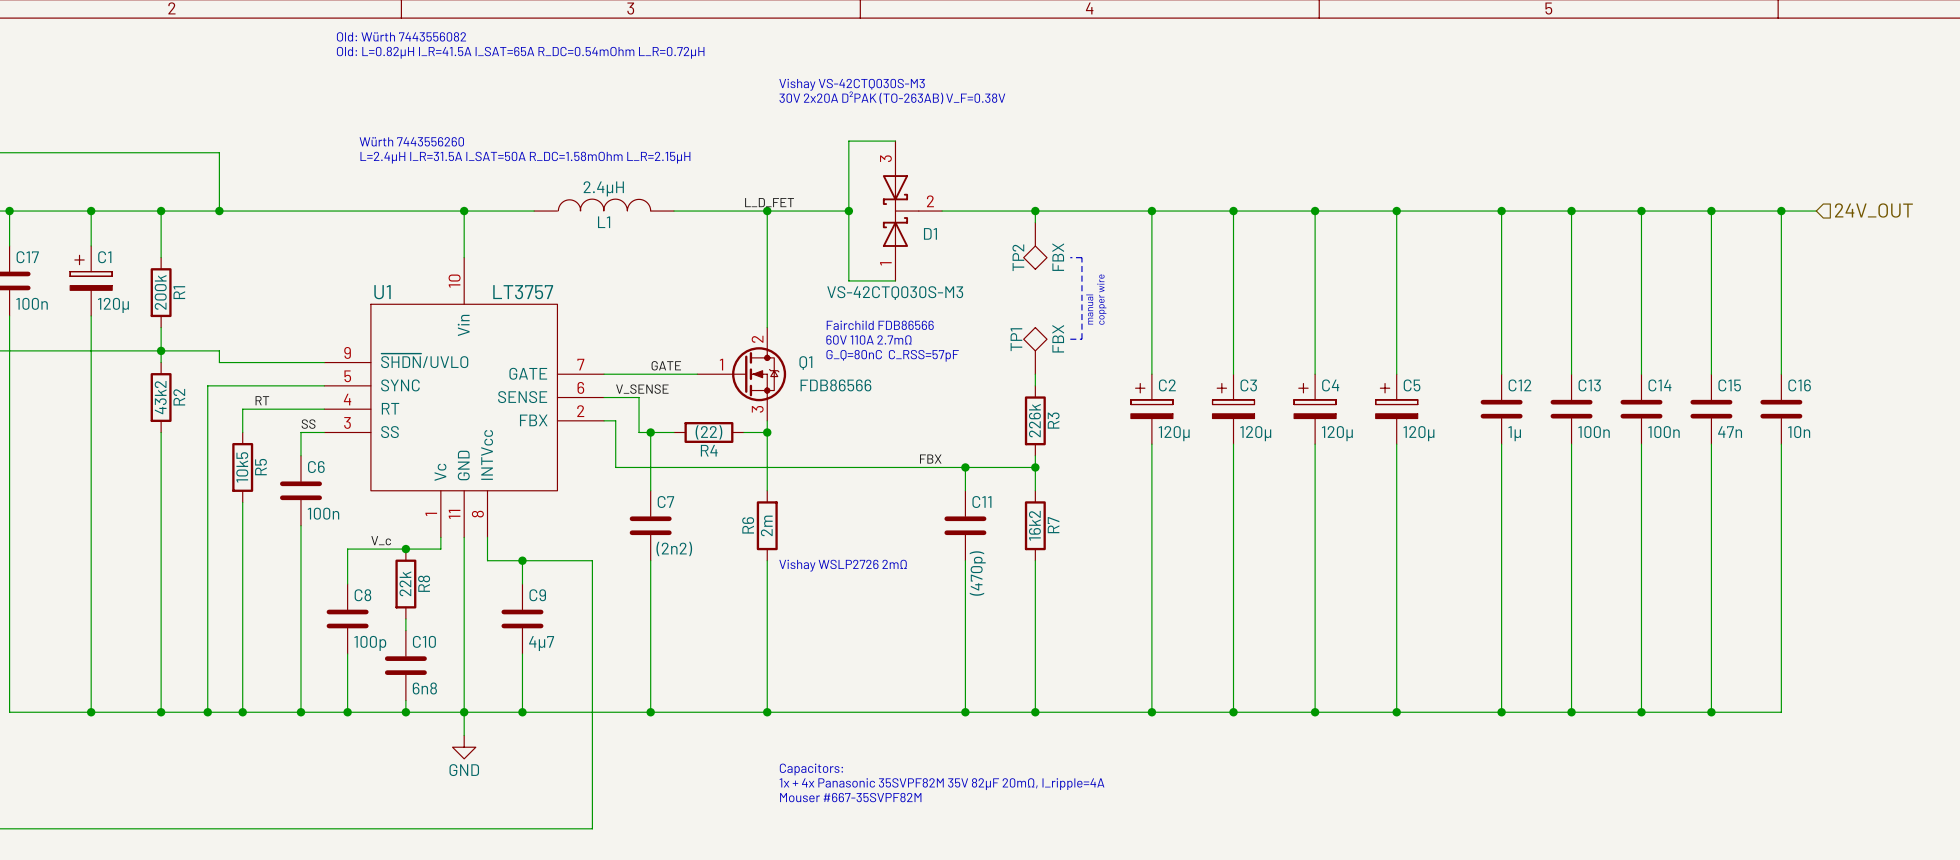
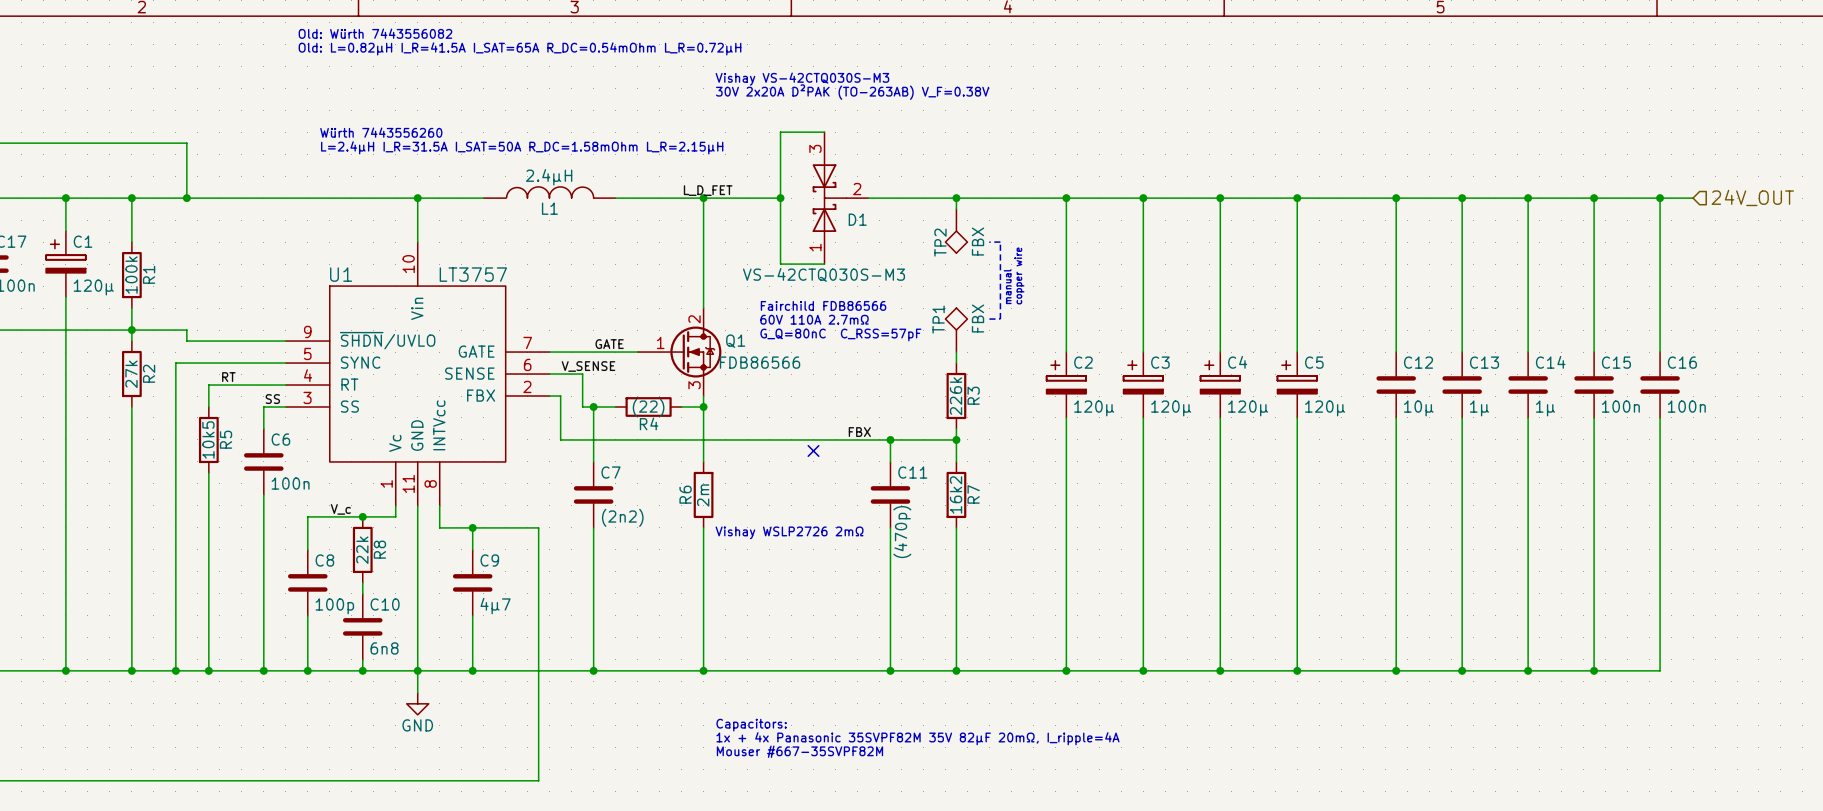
R1 value: 200k (160, 292) -> 100k (131, 275)
R2 value: 43k2 (160, 397) -> 27k (131, 374)
C13 value: 100n (1594, 432) -> 1µ (1479, 408)
C14 value: 100n (1663, 432) -> 1µ (1545, 408)
C15 value: 47n (1730, 432) -> 100n (1620, 406)
C16 value: 10n (1799, 432) -> 100n (1686, 406)
C12 value: 1µ (1514, 433) -> 10µ (1418, 408)
no-connect mark: none -> (813, 450)

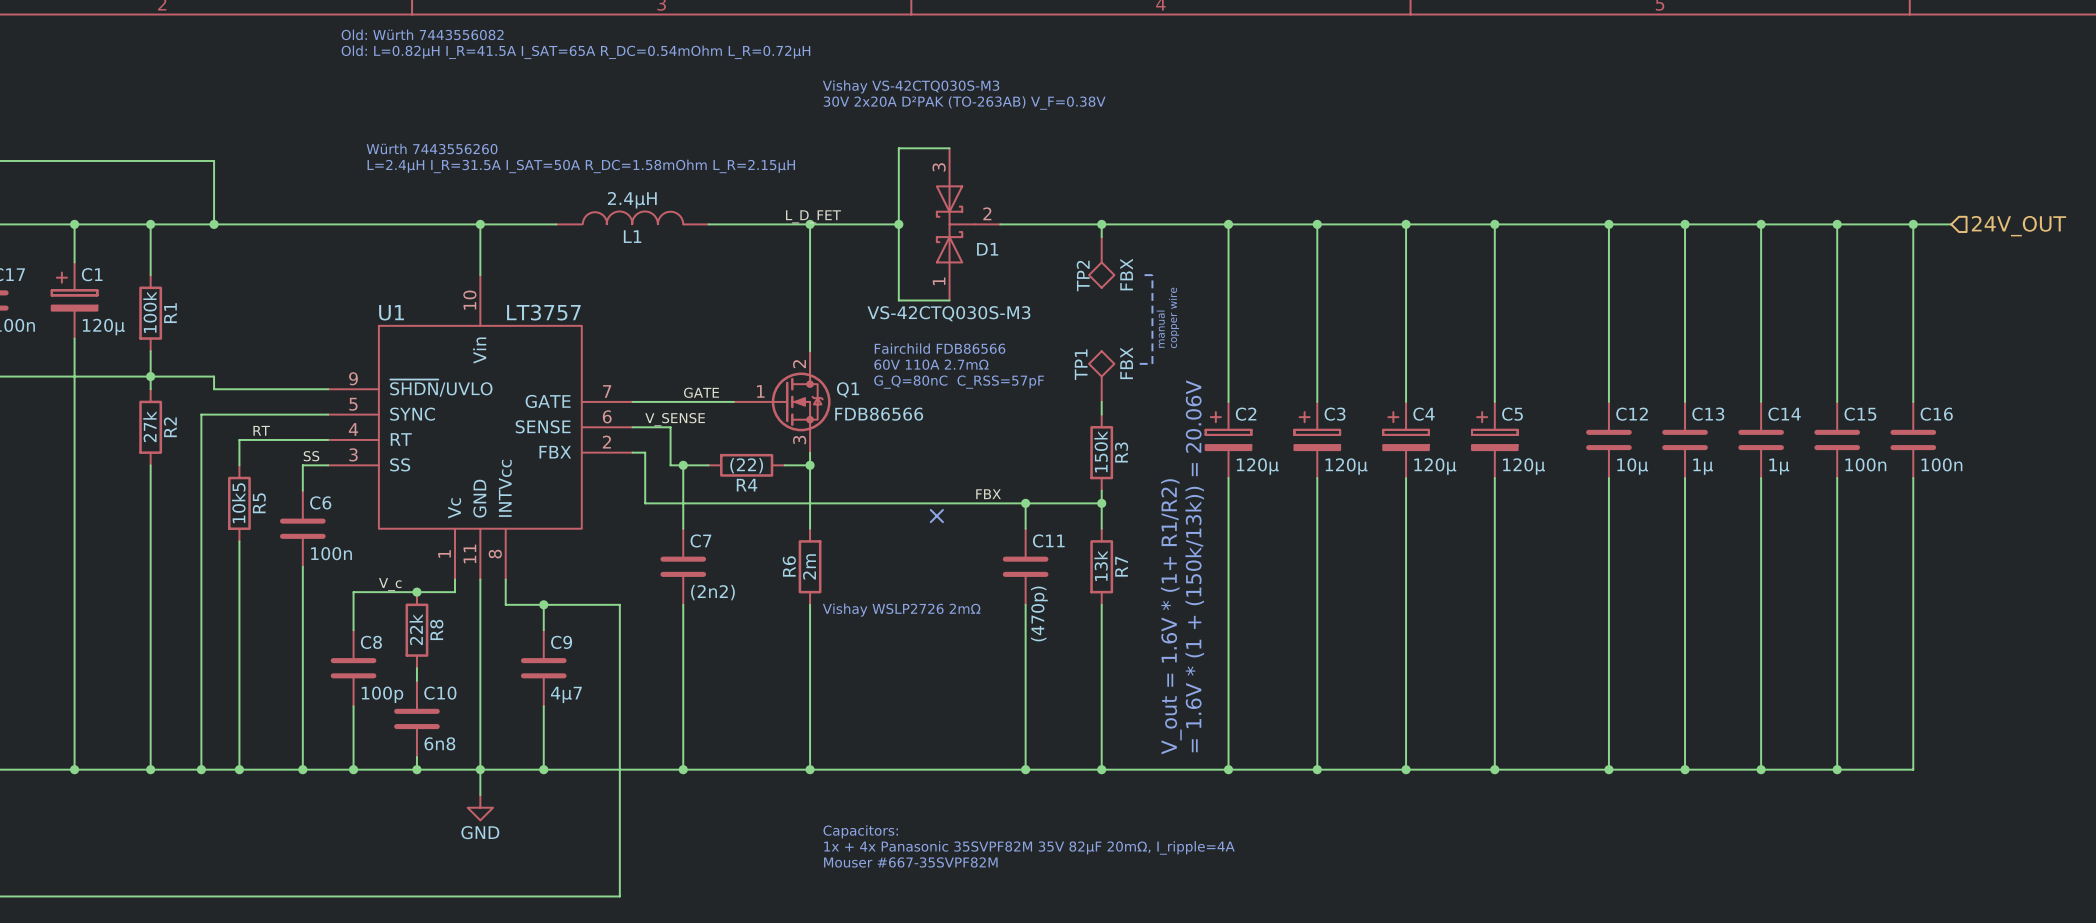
R3 value: 226k (956, 396) -> 150k (1101, 451)
text: none -> = 1.6V * (1 + (150k/13k)) = 20.06V (1194, 566)
R7 value: 16k2 (956, 494) -> 13k (1101, 565)
text: none -> V_out = 1.6V * (1+ R1/R2) (1171, 616)

